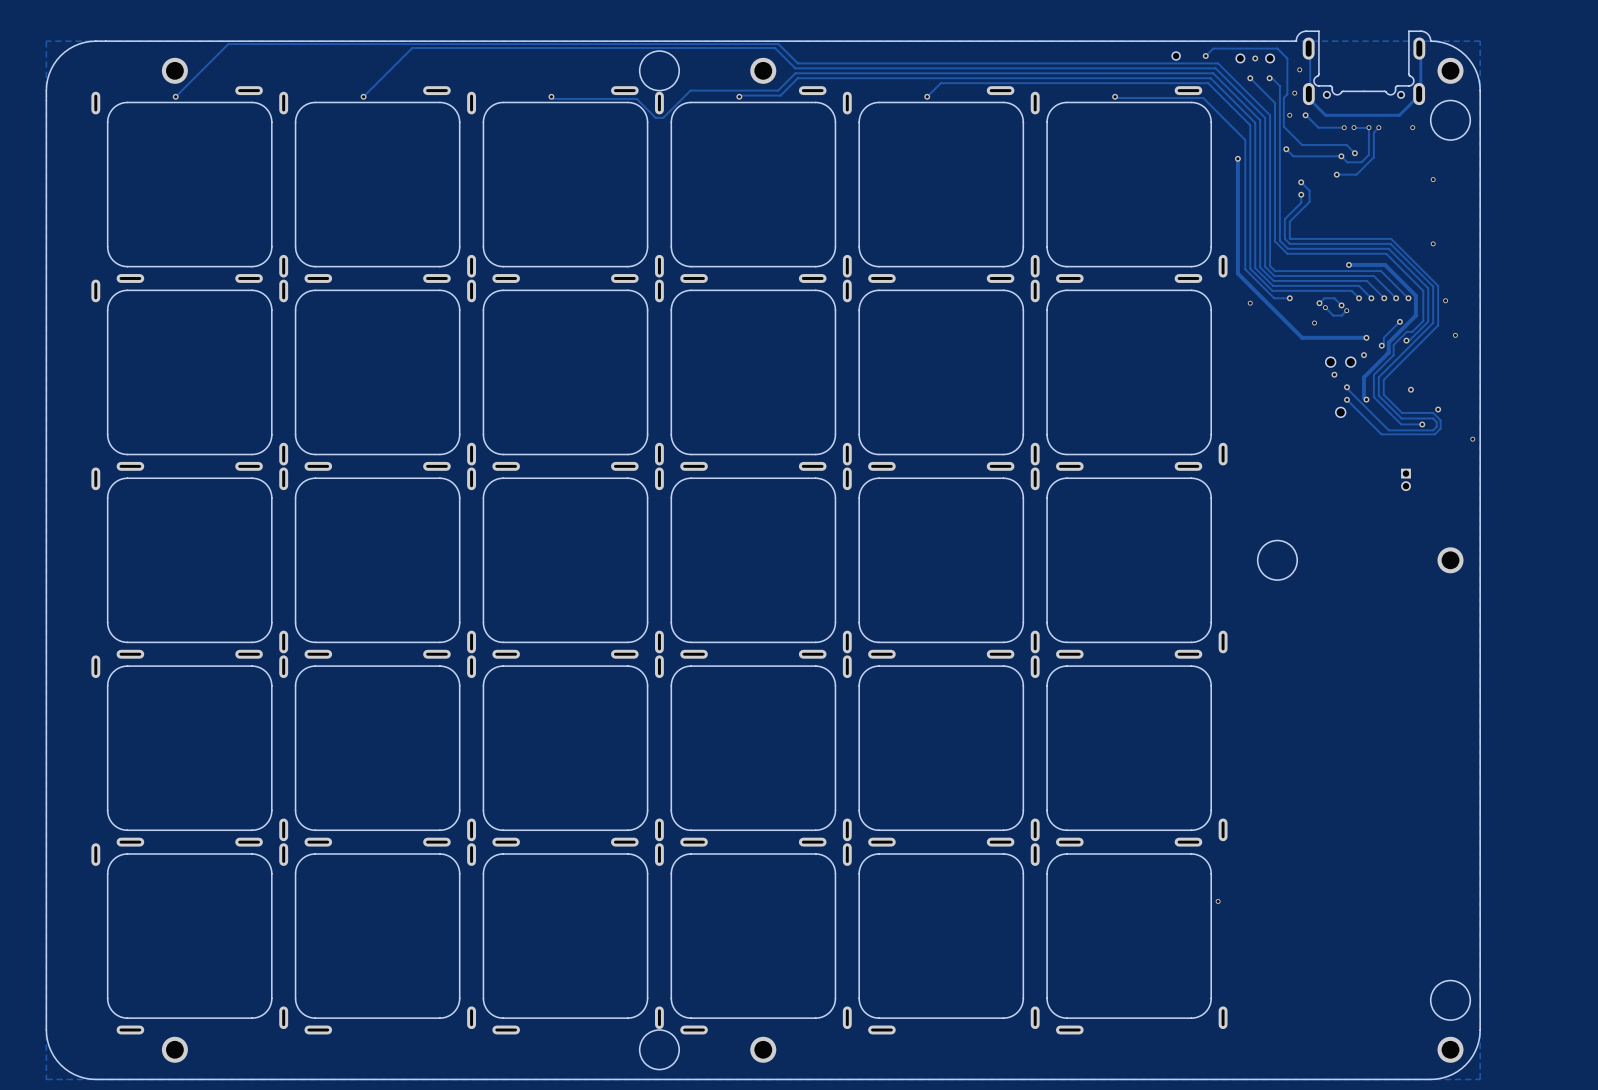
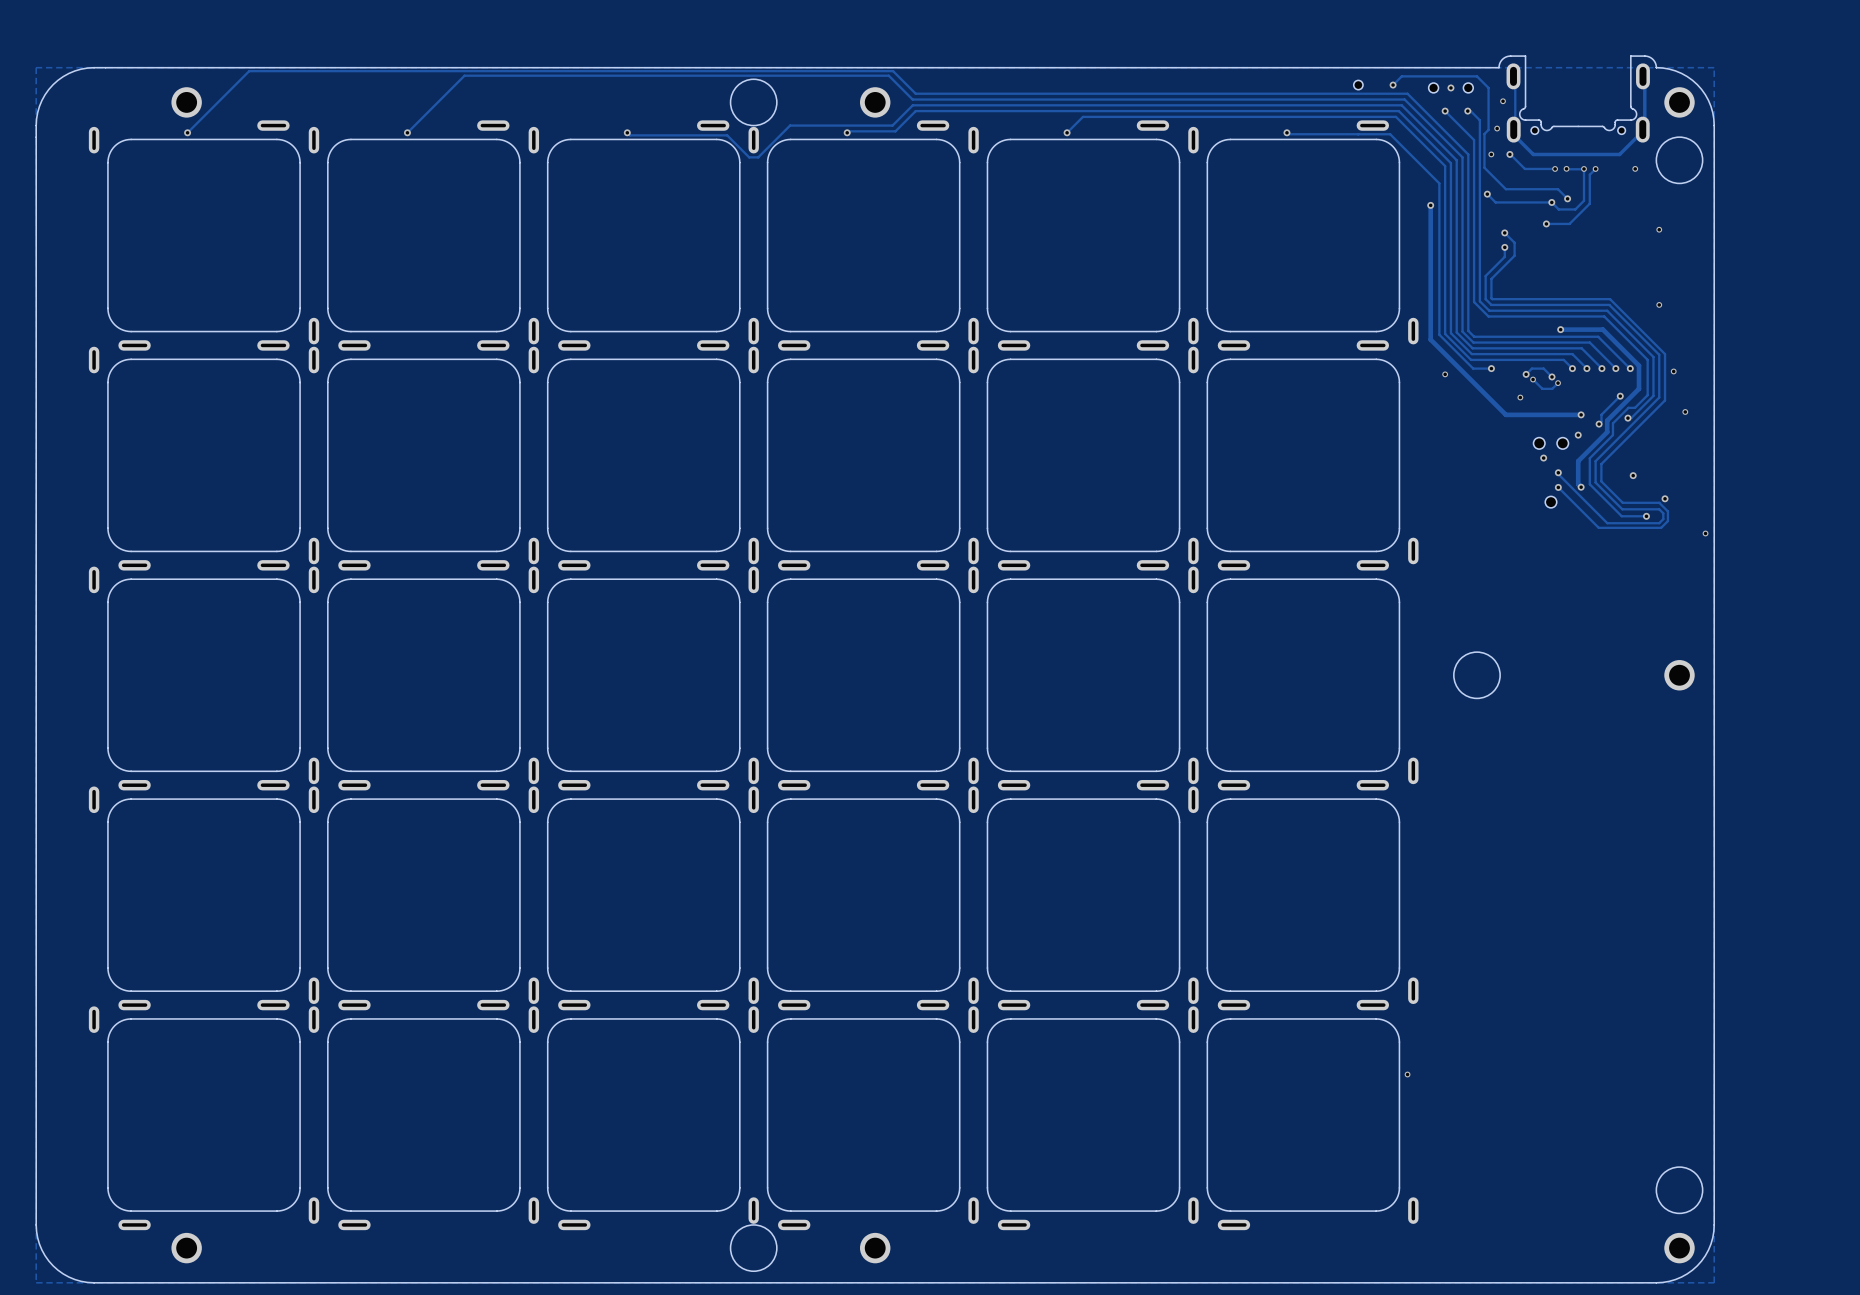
part: (1406, 479) -> none

